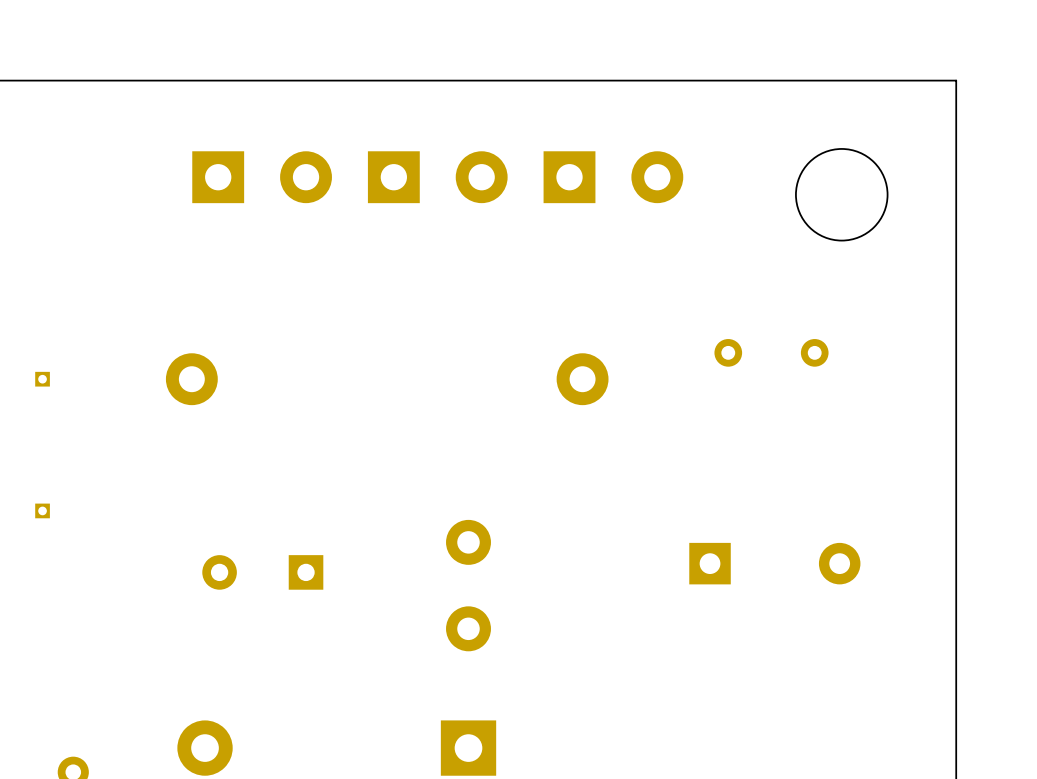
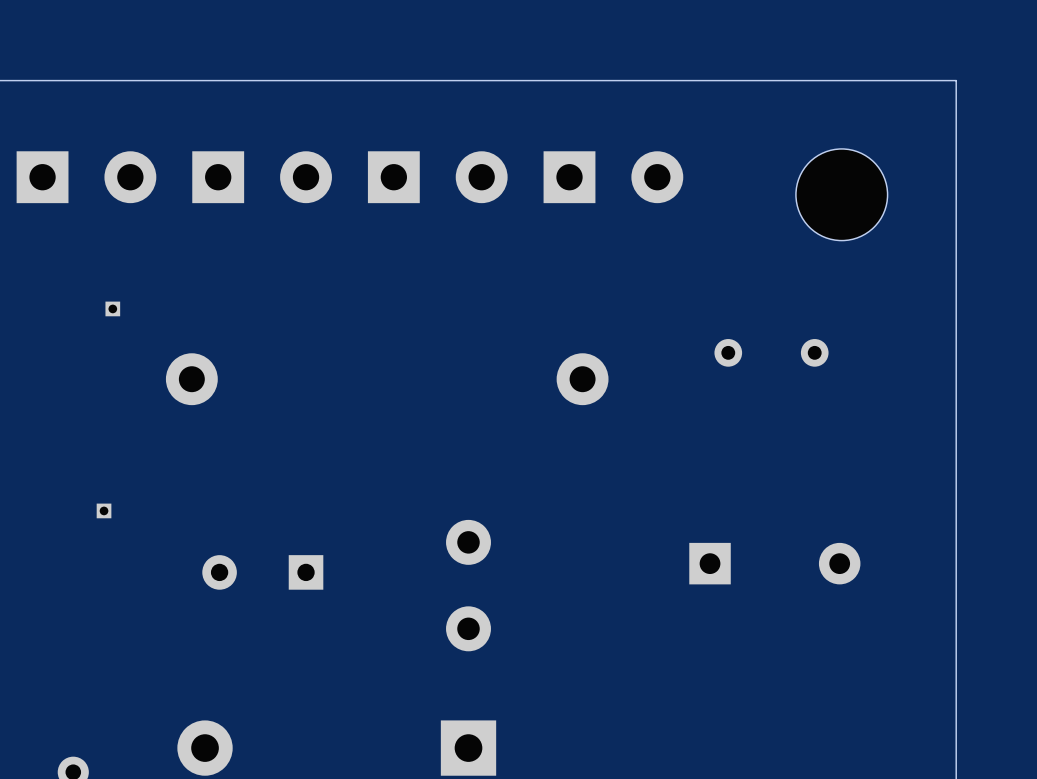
part: none -> (86, 177)
part: none -> (112, 308)
part: (42, 379) -> none
part position: (42, 510) -> (104, 510)

